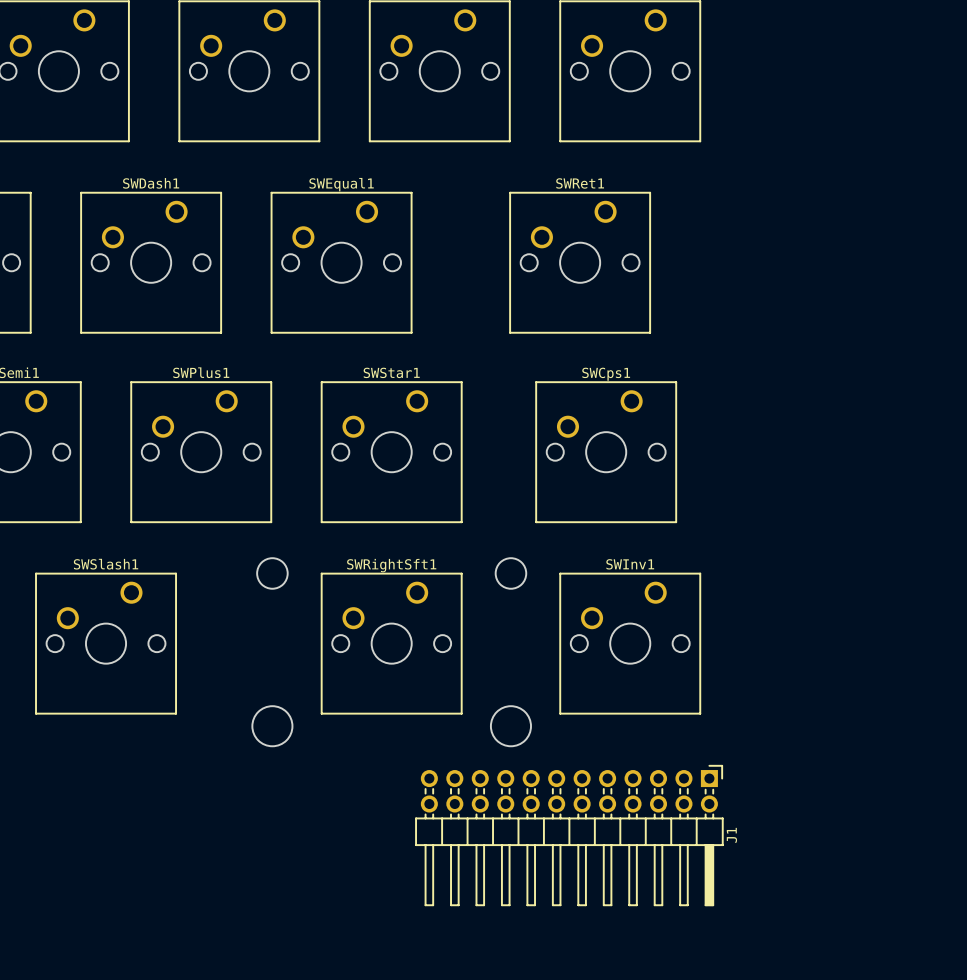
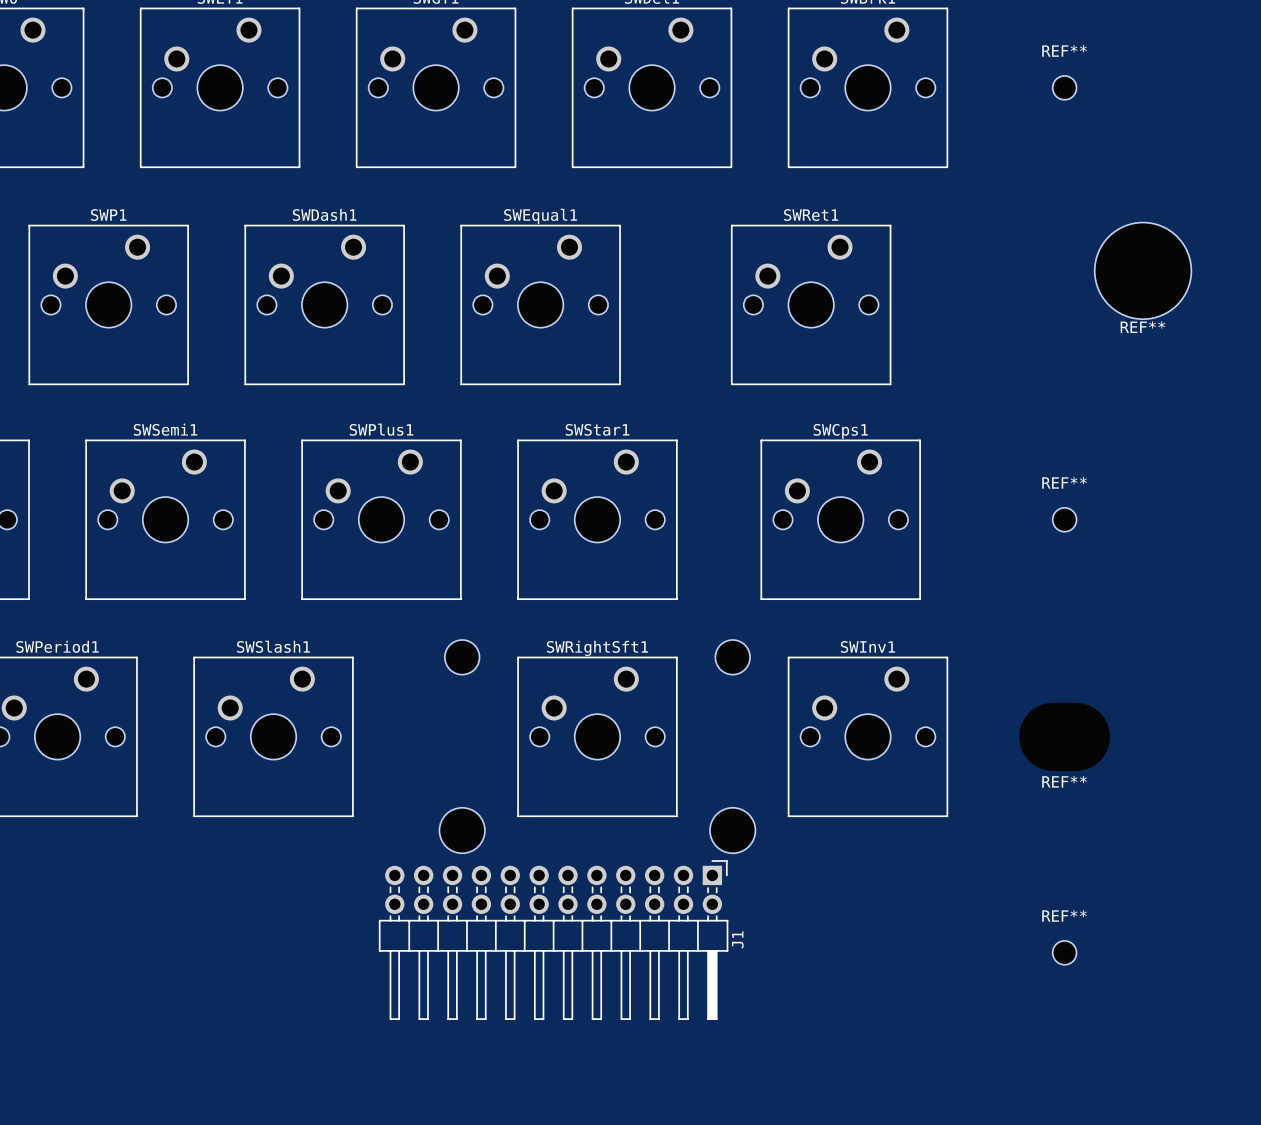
REF**: none -> (1064, 87)
REF**: none -> (1143, 270)
REF**: none -> (1064, 519)
REF**: none -> (1064, 736)
REF**: none -> (1064, 952)
J1 position: (569, 835) -> (553, 940)

